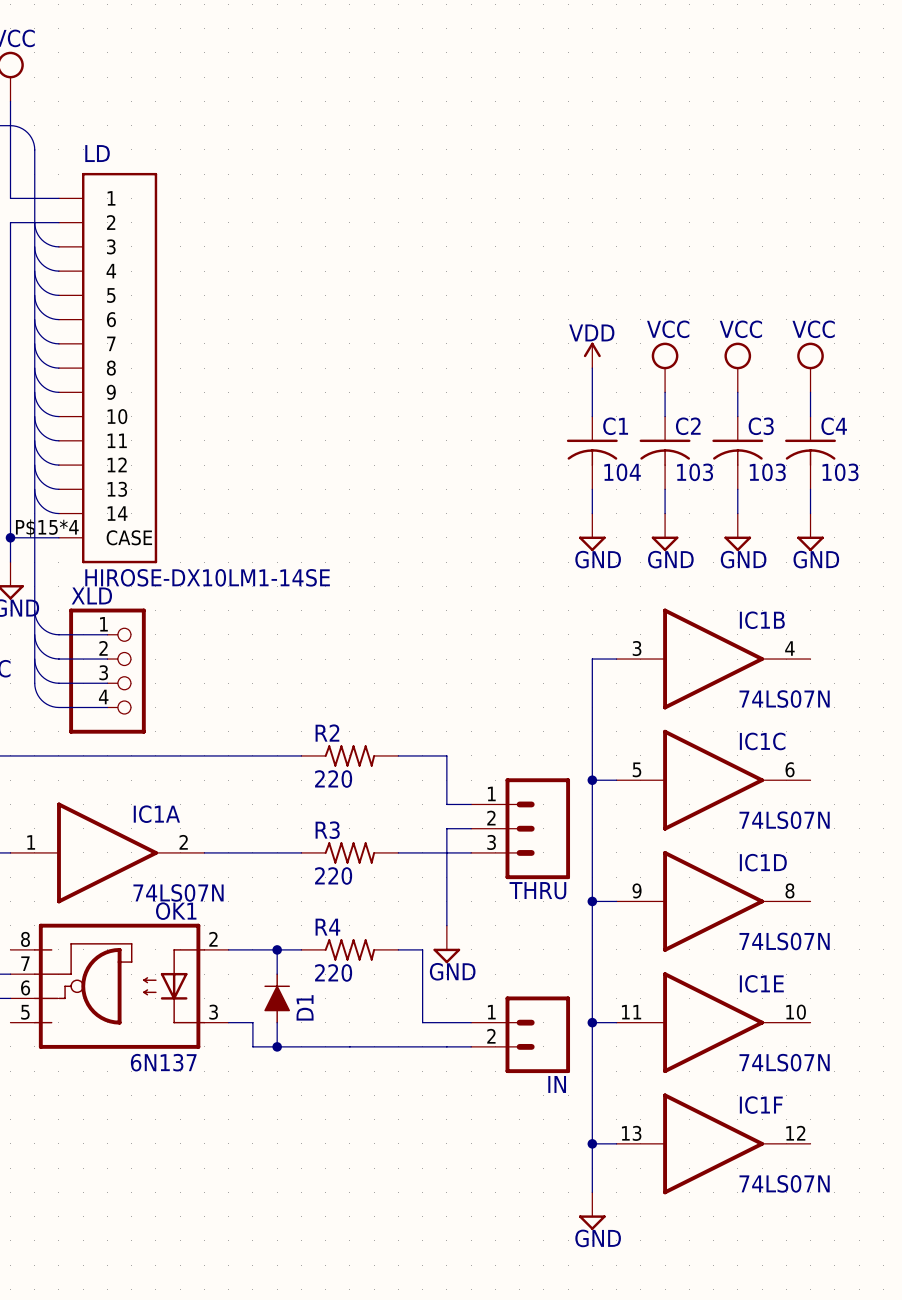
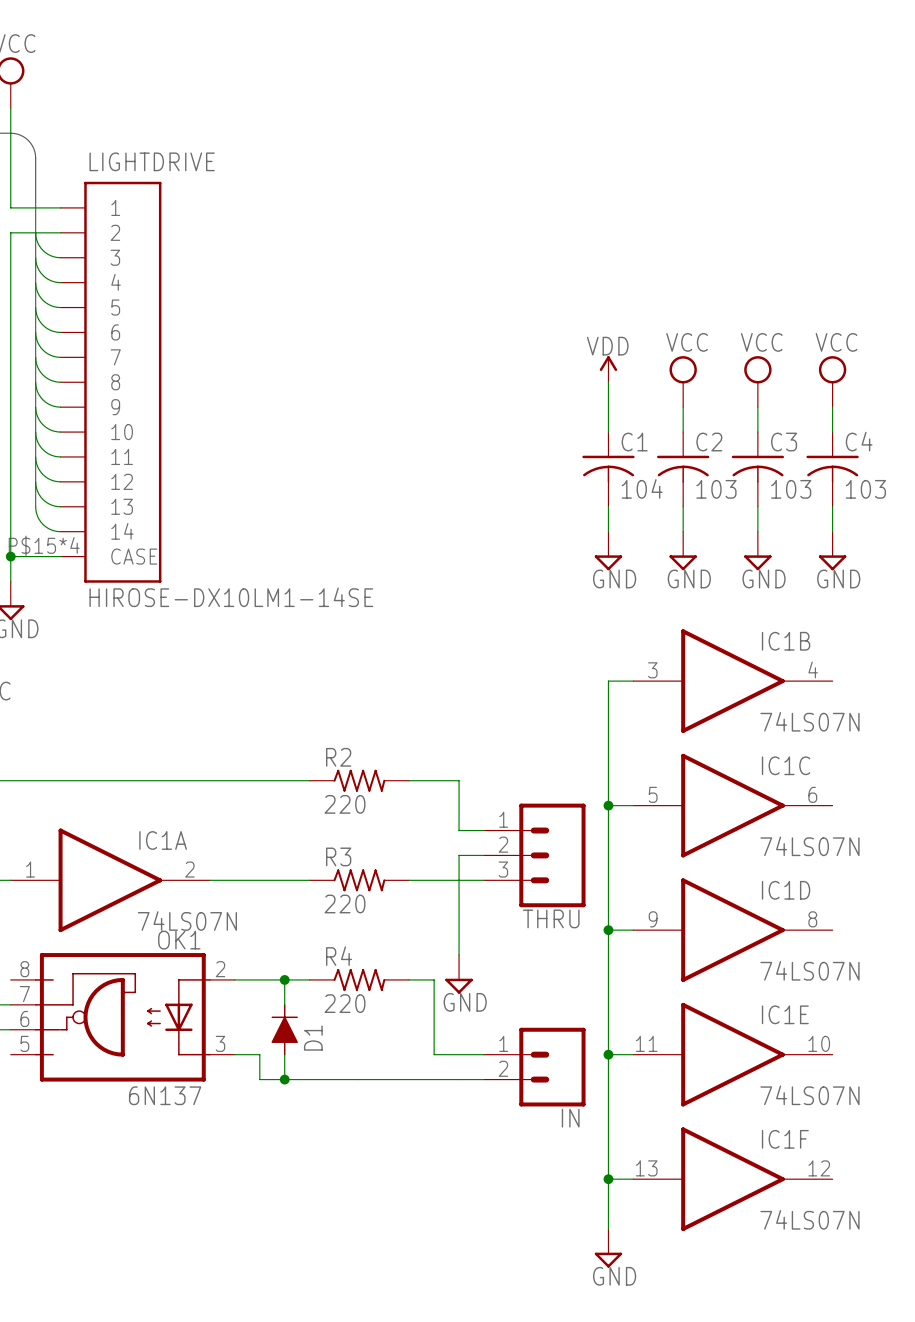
LD name: LD (97, 153) -> LIGHTDRIVE (152, 161)
bus: (34, 489) (34, 683) -> none
wire: (34, 610) (39, 625) (52, 633) (107, 634) -> none
wire: (34, 634) (39, 649) (52, 658) (107, 659) -> none
wire: (34, 659) (39, 673) (52, 682) (107, 683) -> none
XLD: (107, 671) -> none
wire: (34, 683) (39, 698) (52, 706) (107, 707) -> none

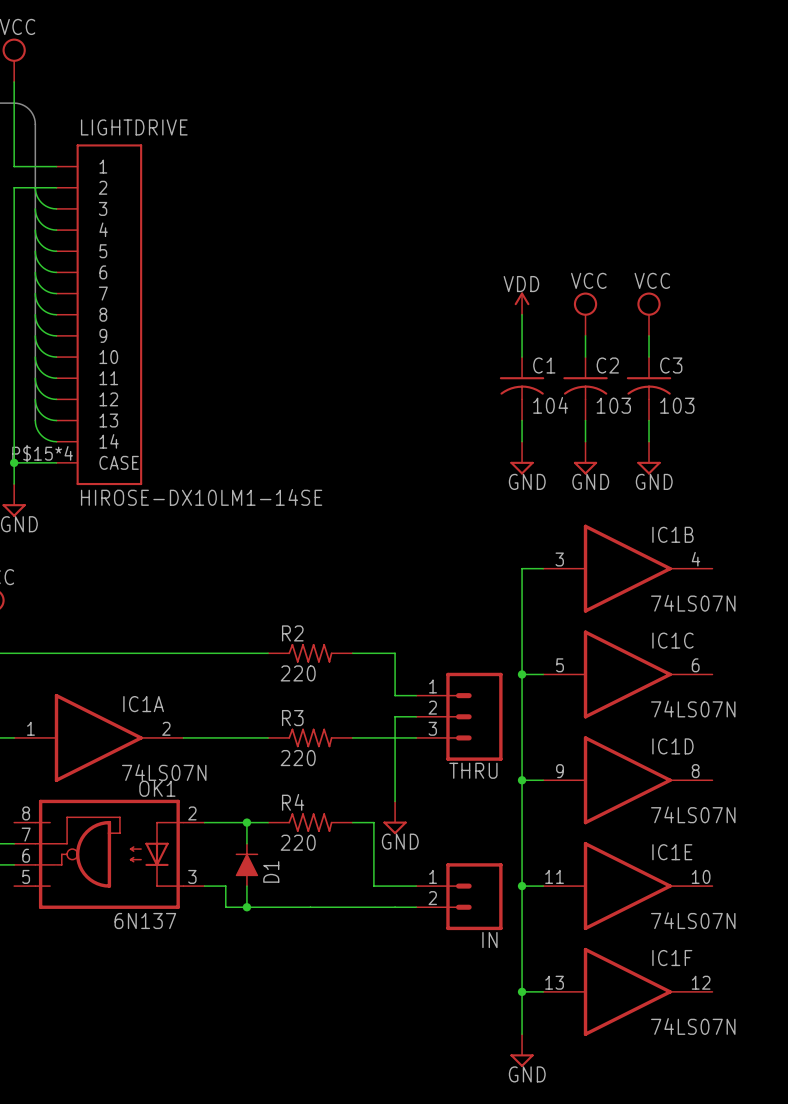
power symbol: VCC (832, 381) -> none
wire: (832, 407) (832, 432) -> none
C4: 103 (832, 469) -> none
wire: (832, 506) (832, 531) -> none
power symbol: GND (832, 550) -> none

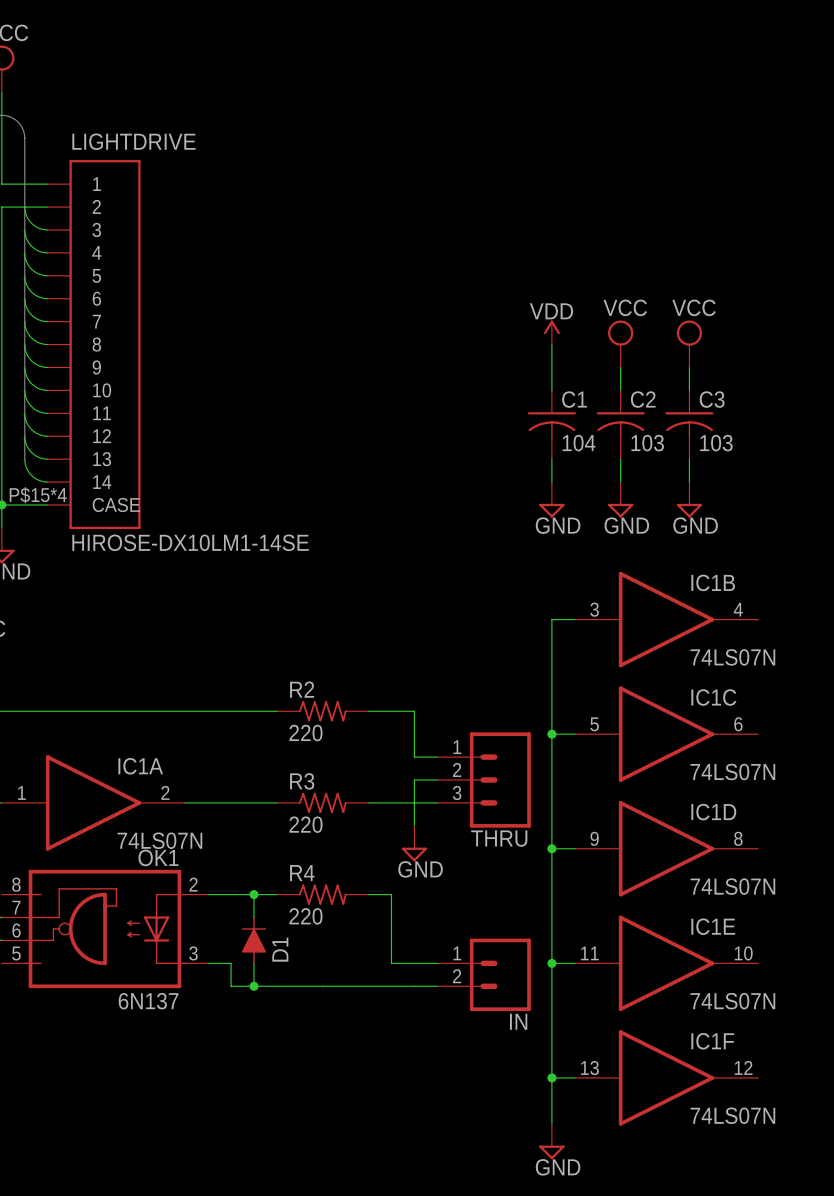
power symbol position: GND (395, 817) -> GND (414, 843)

